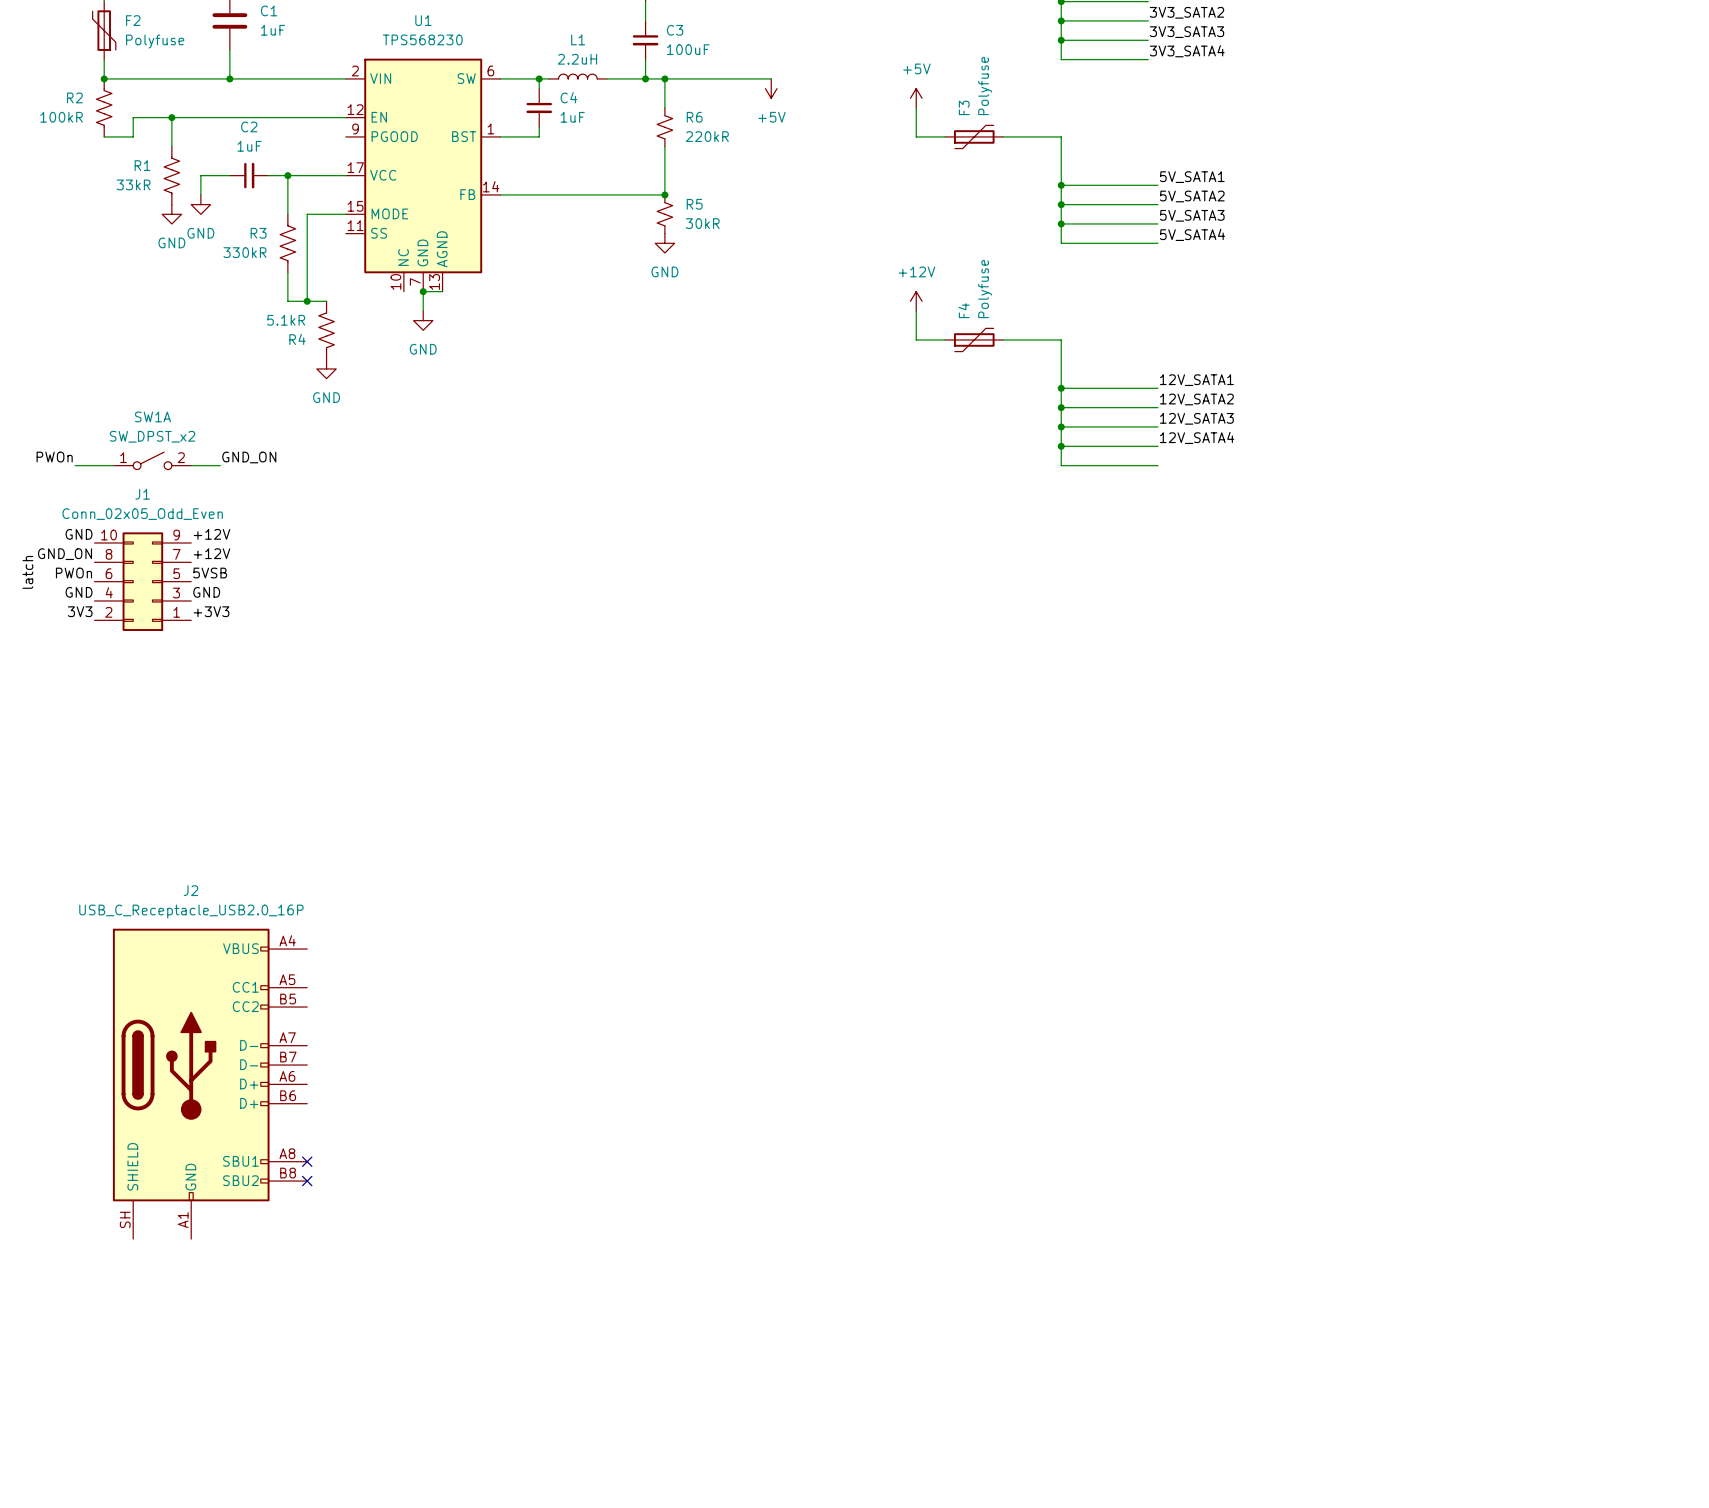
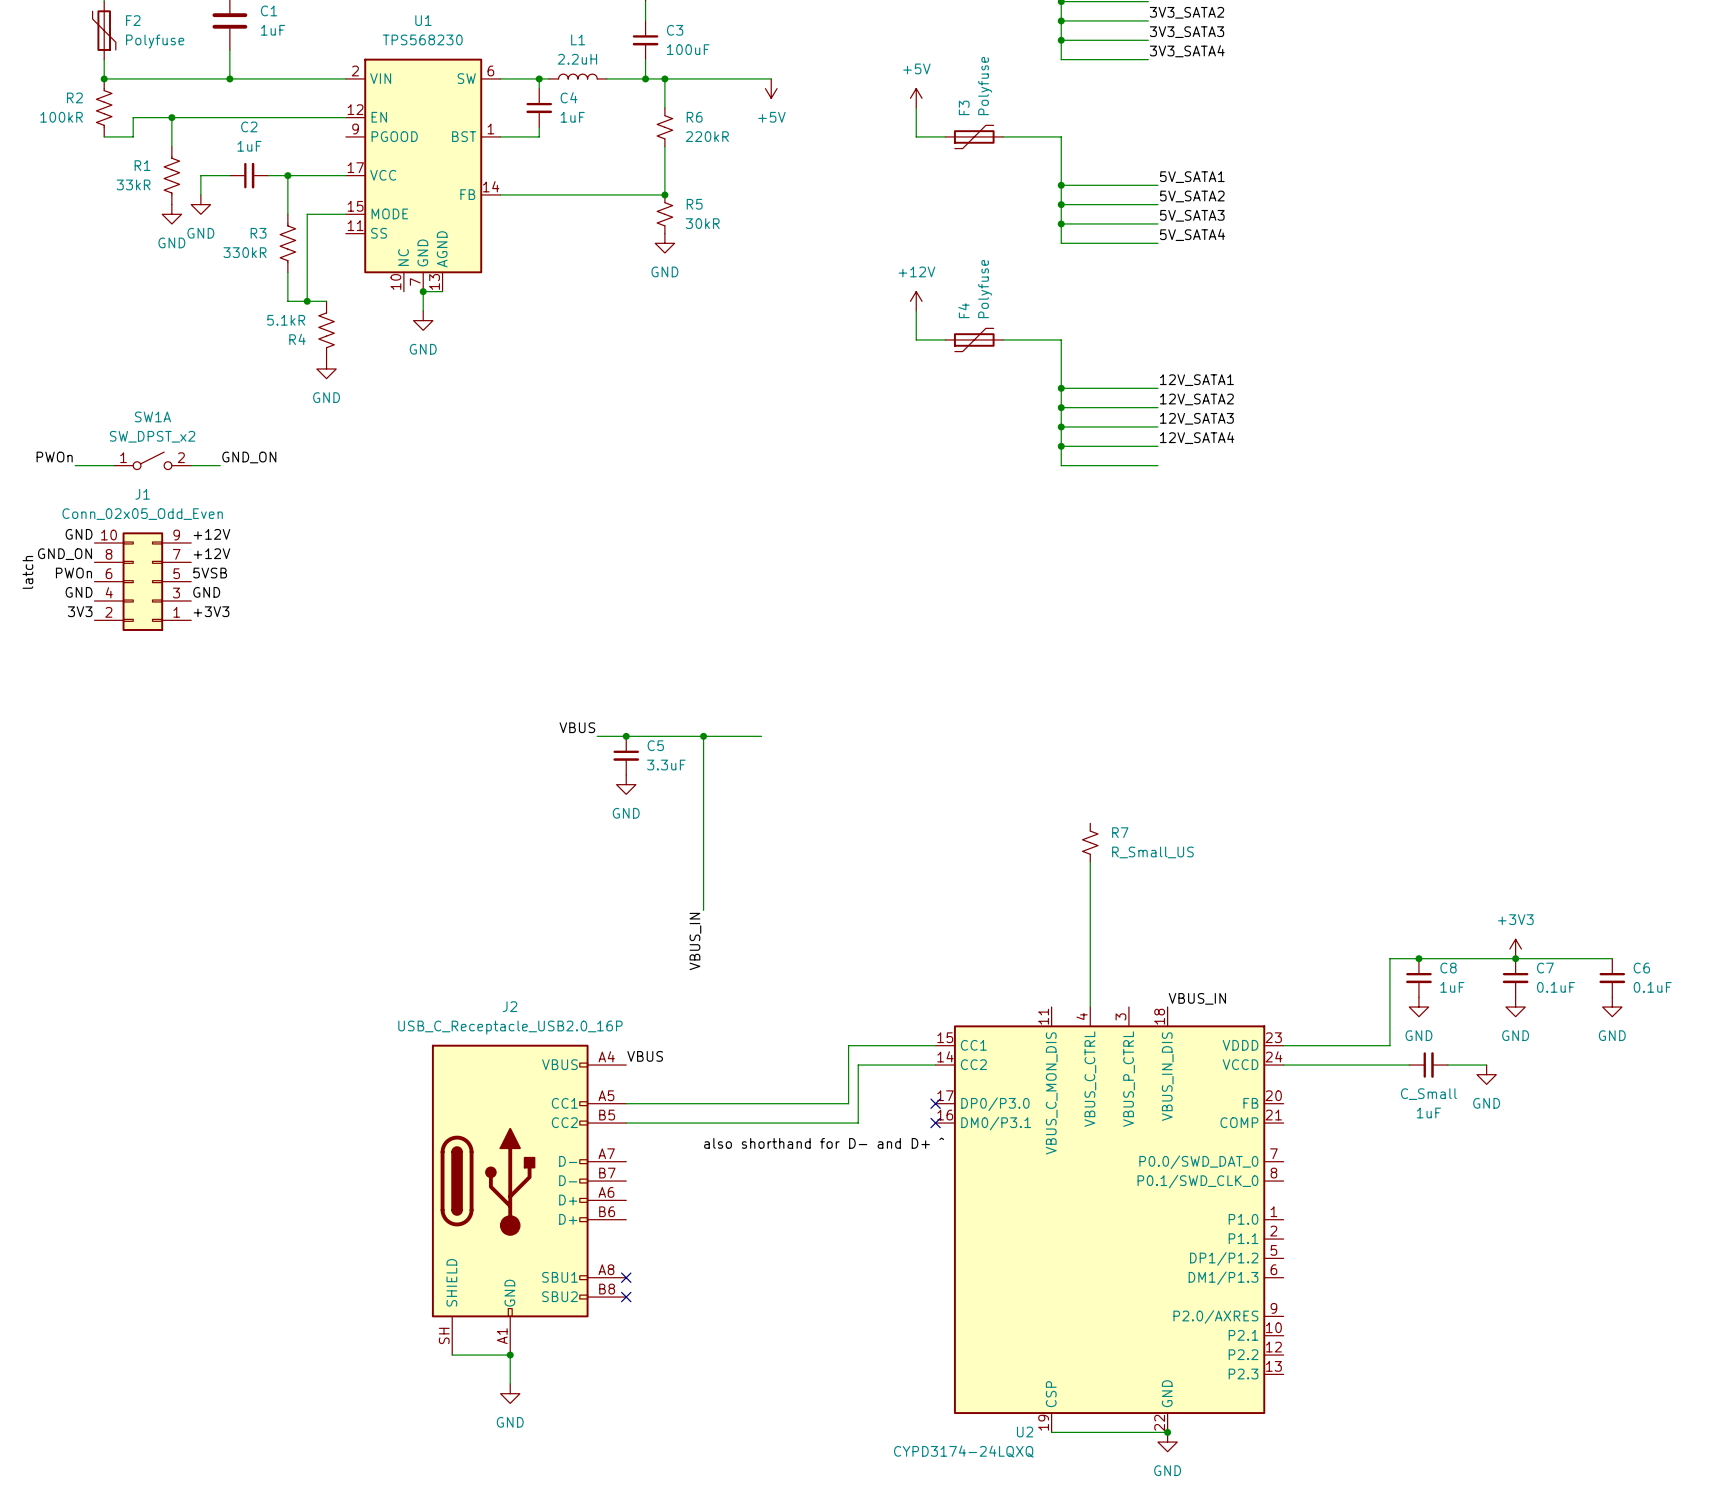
label: none -> VBUS (577, 727)
wire: none -> (597, 736) (761, 736)
junction: none -> (626, 736)
wire: none -> (703, 736) (703, 910)
junction: none -> (703, 736)
C5: none -> 3.3uF (626, 755)
power symbol: none -> GND (626, 784)
R7: none -> R_Small_US (1090, 842)
wire: none -> (1090, 862) (1090, 1007)
label: none -> VBUS_IN (695, 941)
power symbol: none -> +3V3 (1515, 949)
junction: none -> (1418, 958)
junction: none -> (1515, 958)
wire: none -> (1612, 958) (1389, 958) (1389, 1045) (1283, 1045)
C8: none -> 1uF (1418, 978)
C7: none -> 0.1uF (1515, 978)
C6: none -> 0.1uF (1612, 978)
label: none -> VBUS_IN (1197, 998)
power symbol: none -> GND (1418, 1007)
power symbol: none -> GND (1515, 1007)
power symbol: none -> GND (1612, 1007)
wire: none -> (935, 1045) (848, 1045) (848, 1103) (626, 1103)
label: none -> VBUS (645, 1056)
wire: none -> (935, 1065) (858, 1065) (858, 1123) (626, 1123)
wire: none -> (1283, 1065) (1409, 1065)
1uF: none -> C_Small (1428, 1065)
wire: none -> (1447, 1065) (1486, 1065)
power symbol: none -> GND (1486, 1074)
J2 position: (210, 1083) -> (529, 1199)
no-connect mark: none -> (935, 1103)
no-connect mark: none -> (935, 1123)
label: none -> also shorthand for D- and D+ ^ (824, 1143)
no-connect mark: (307, 1161) -> none
no-connect mark: (307, 1181) -> none
U2: none -> CYPD3174-24LQXQ (1109, 1219)
no-connect mark: none -> (626, 1277)
no-connect mark: none -> (626, 1297)
wire: none -> (452, 1355) (510, 1355) (510, 1384)
junction: none -> (510, 1355)
power symbol: none -> GND (510, 1393)
wire: none -> (1051, 1432) (1167, 1432)
junction: none -> (1167, 1432)
power symbol: none -> GND (1167, 1442)

